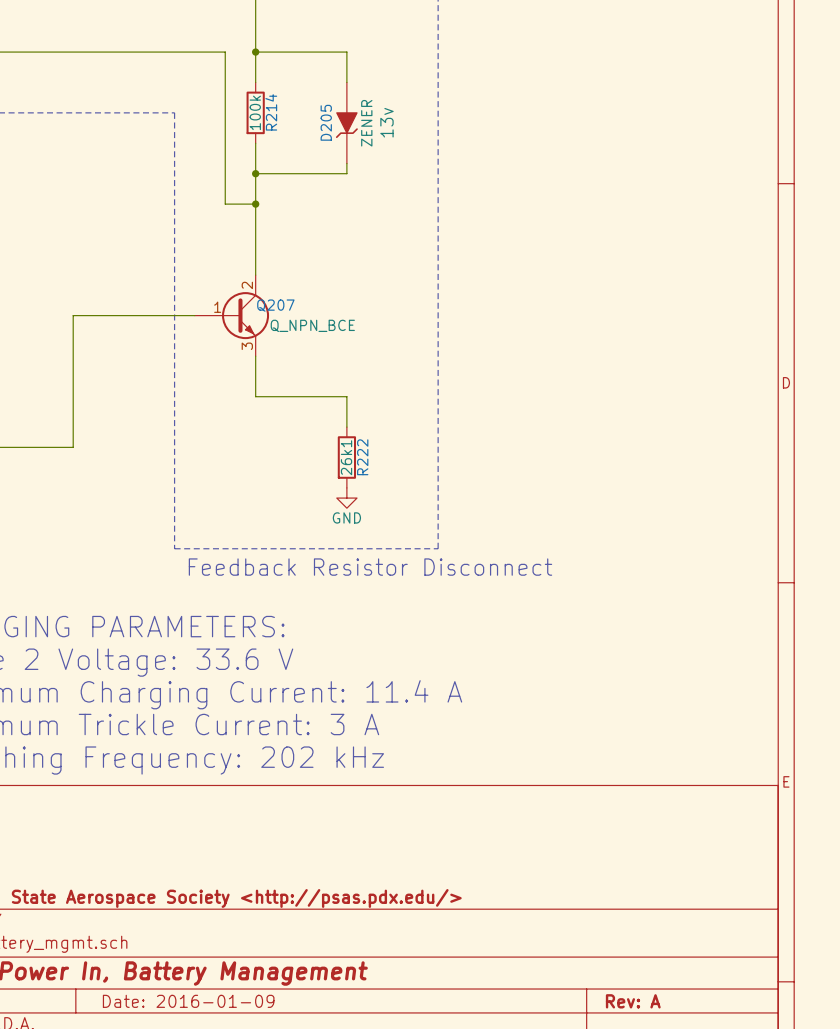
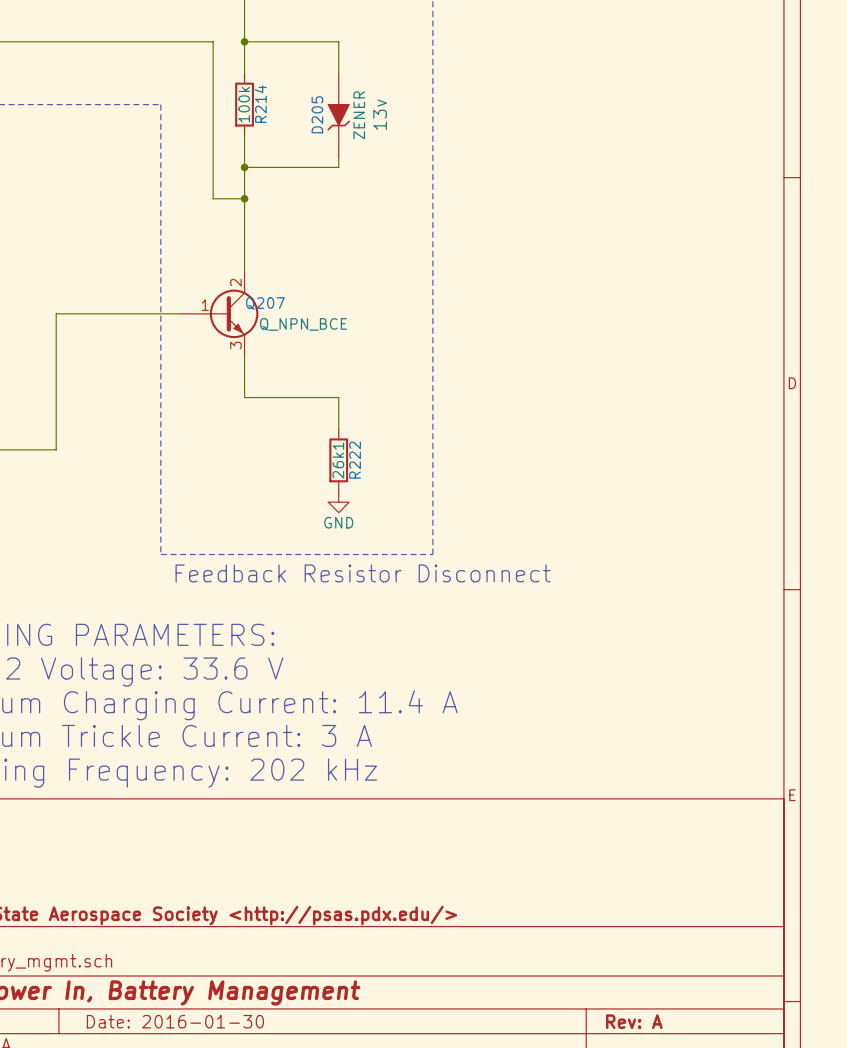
title block: Date: 2016-01-09 (188, 1001) -> Date: 2016-01-30 (175, 1021)

